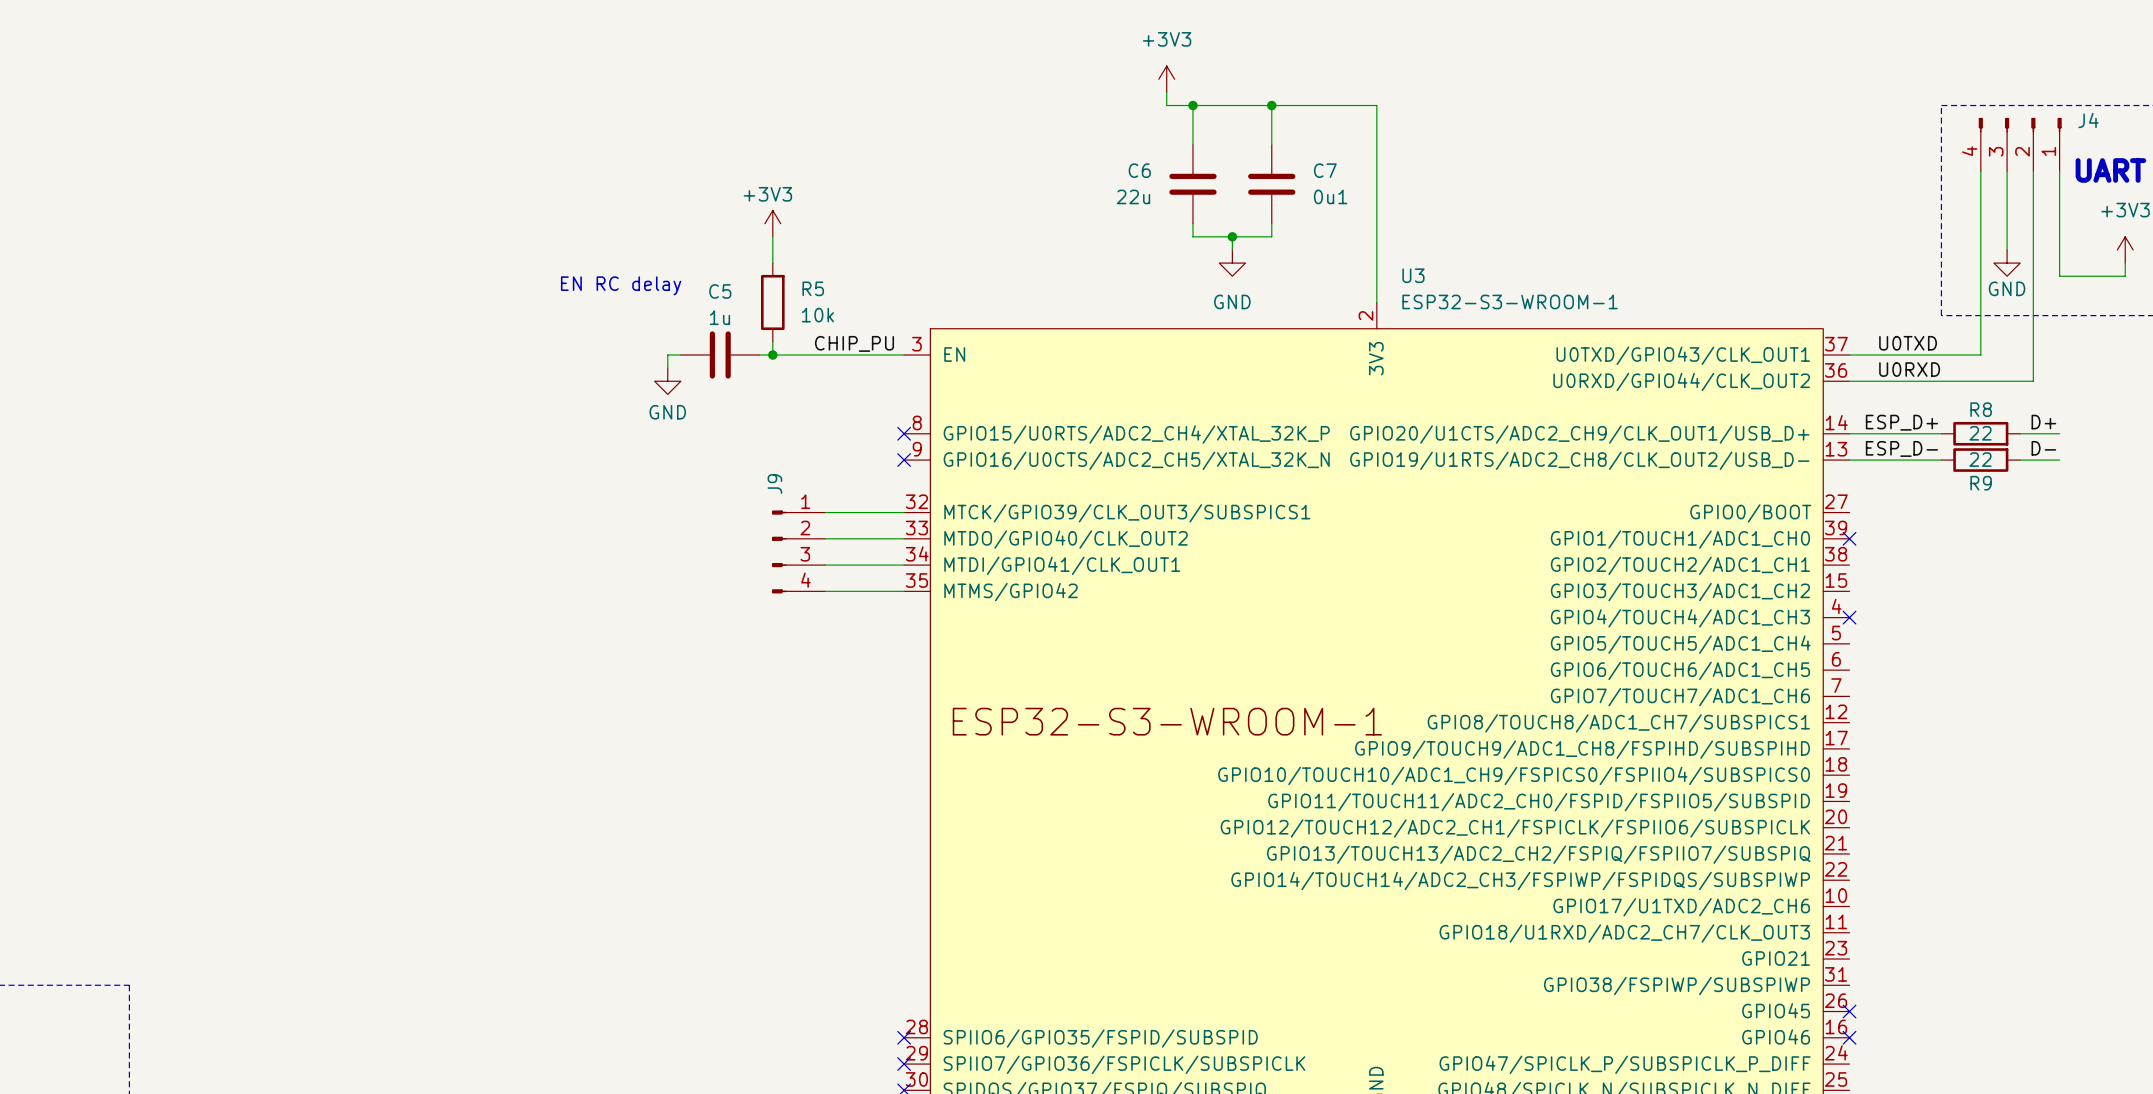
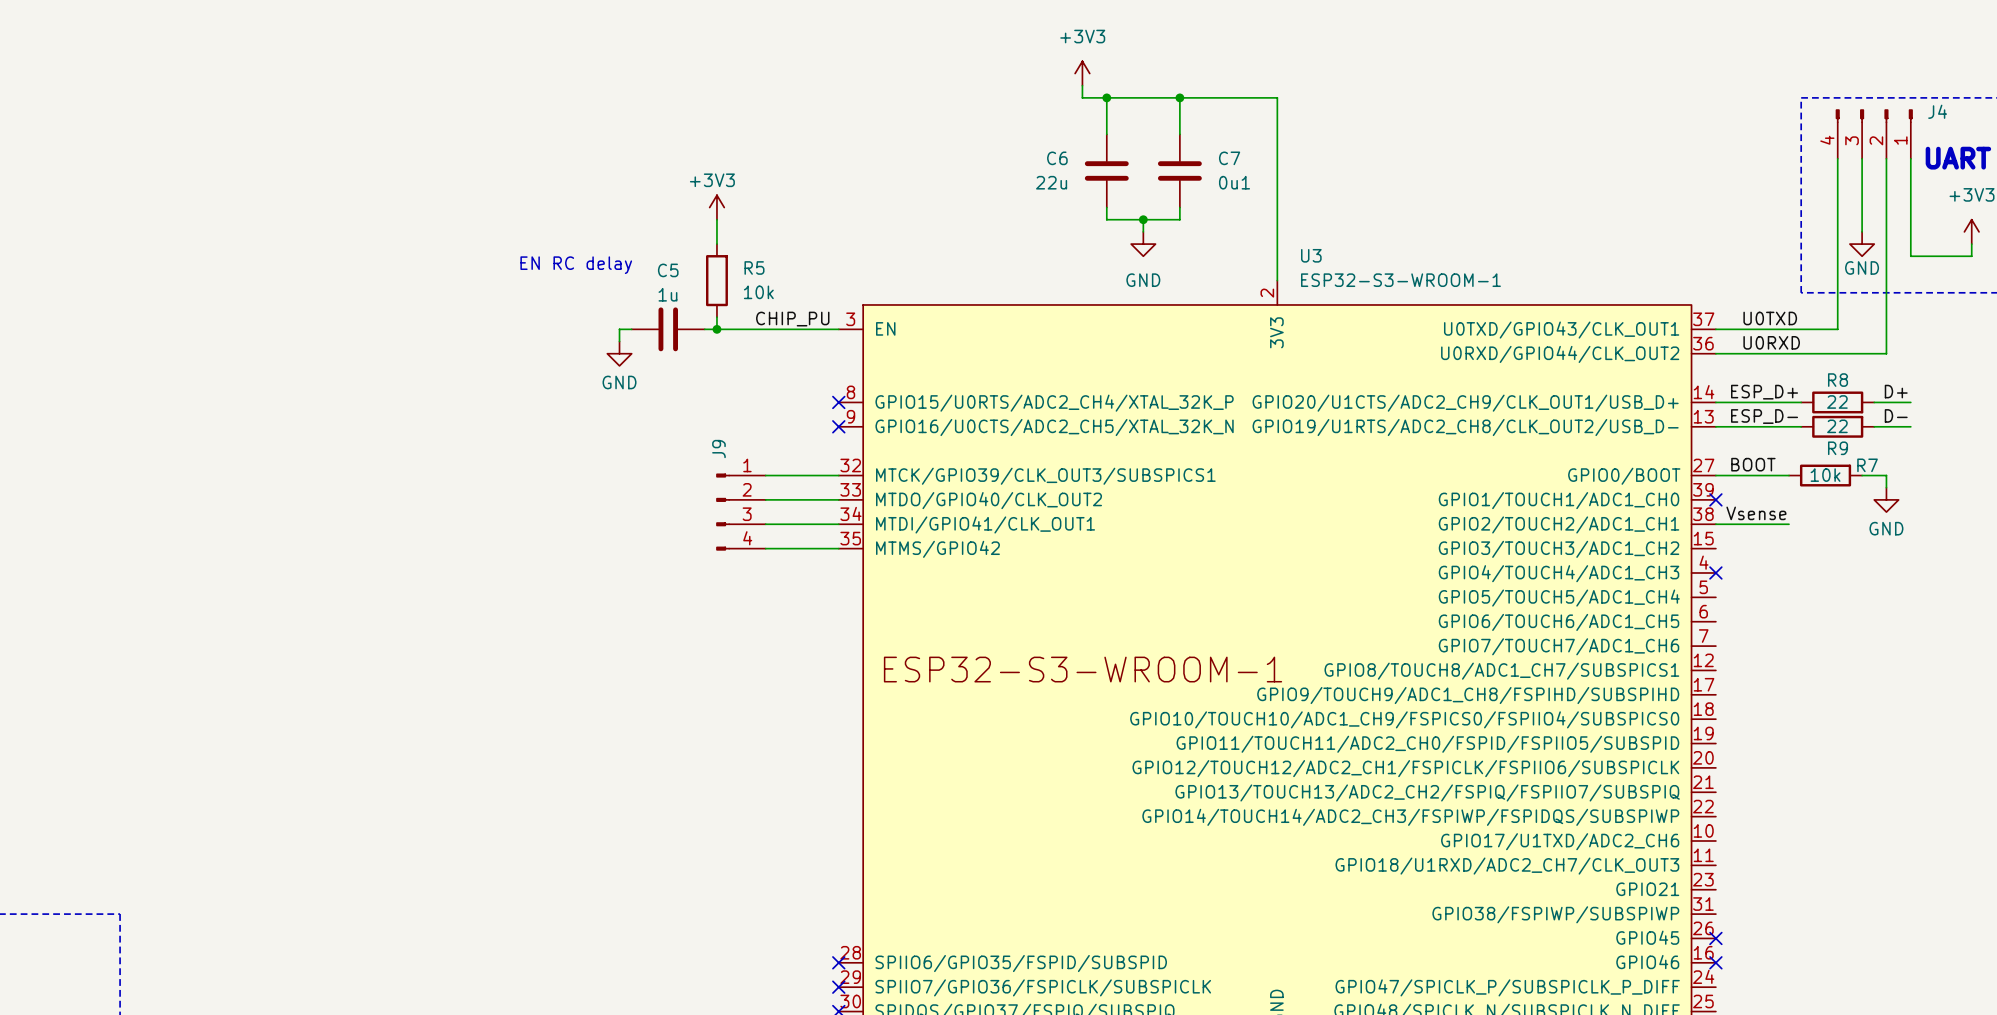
label: none -> BOOT (1753, 464)
wire: none -> (1715, 475) (1788, 475)
R7: none -> 10k (1825, 475)
wire: none -> (1862, 475) (1886, 475) (1886, 487)
power symbol: none -> GND (1886, 499)
label: none -> Vsense (1756, 513)
wire: none -> (1715, 524) (1788, 524)

